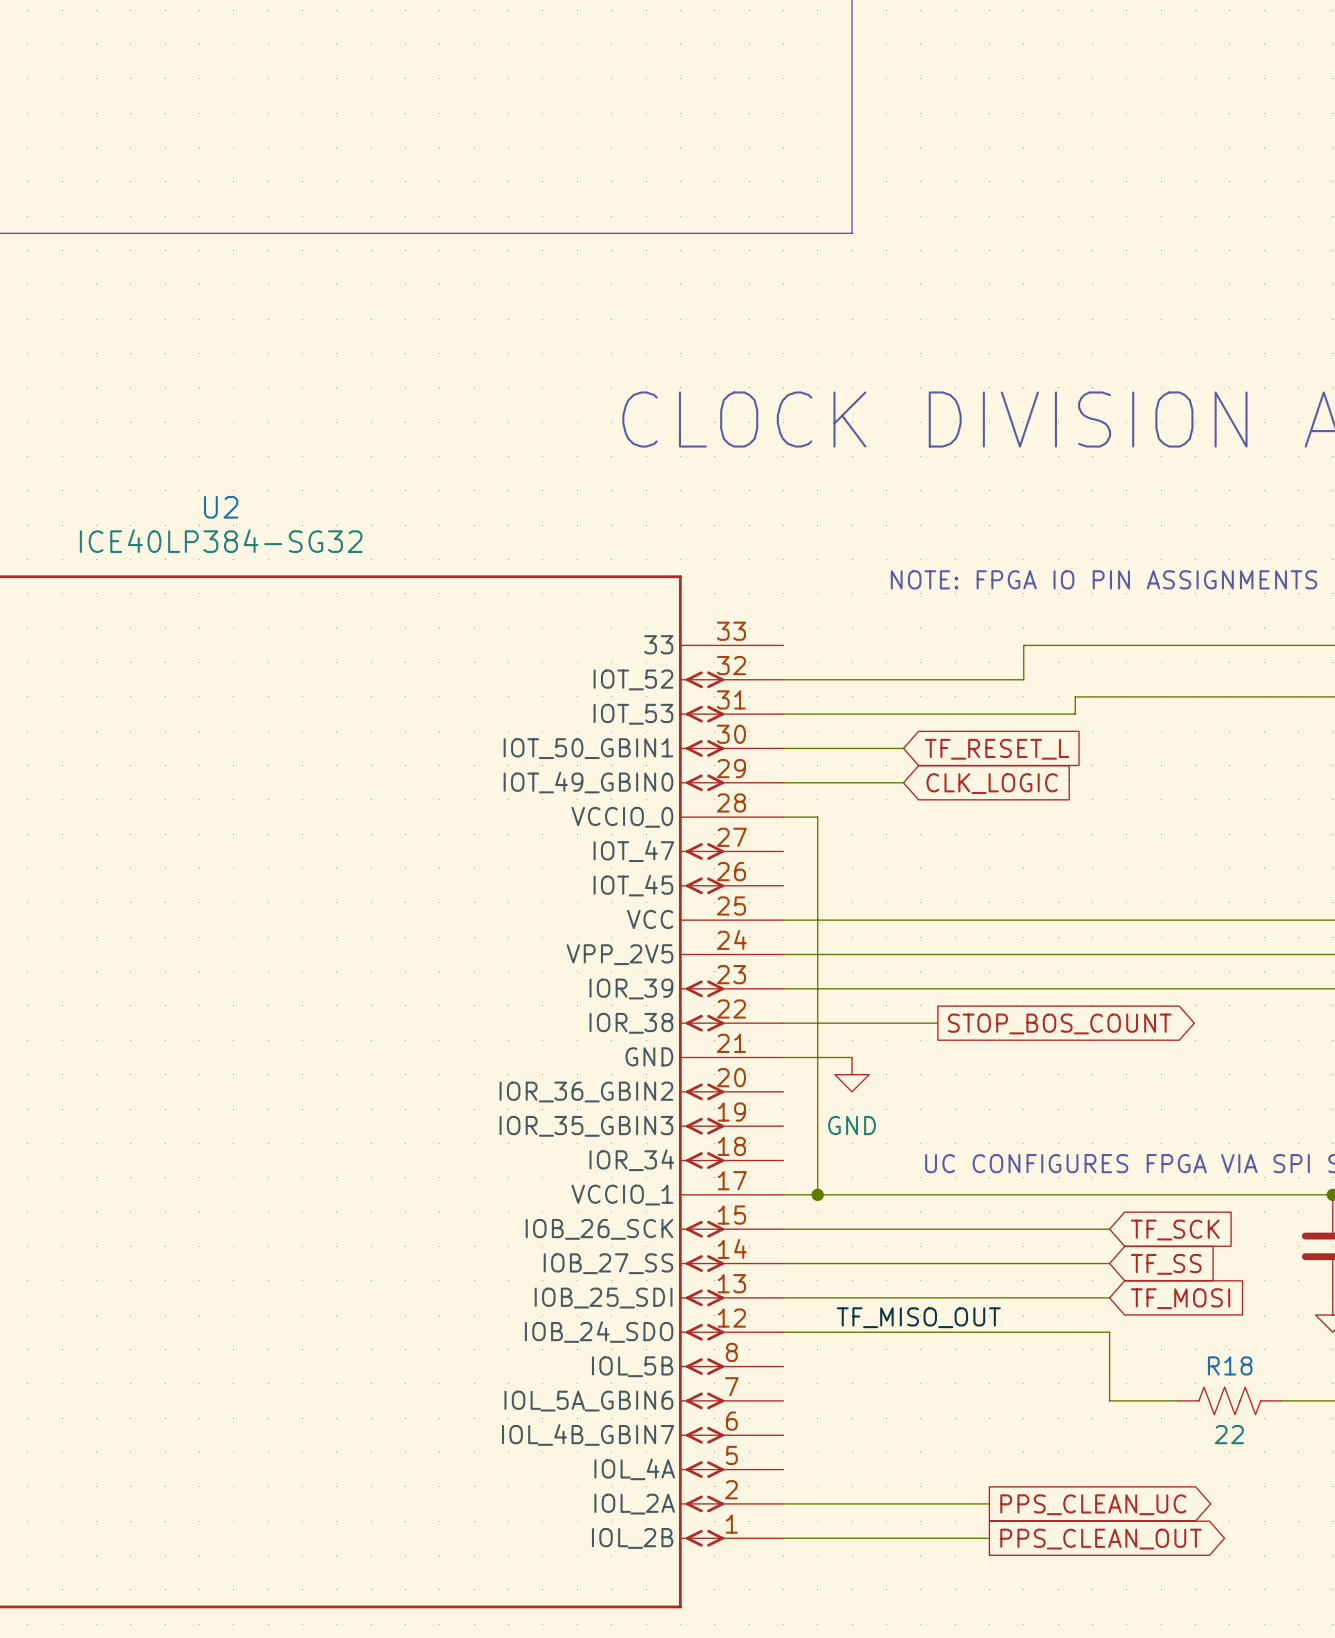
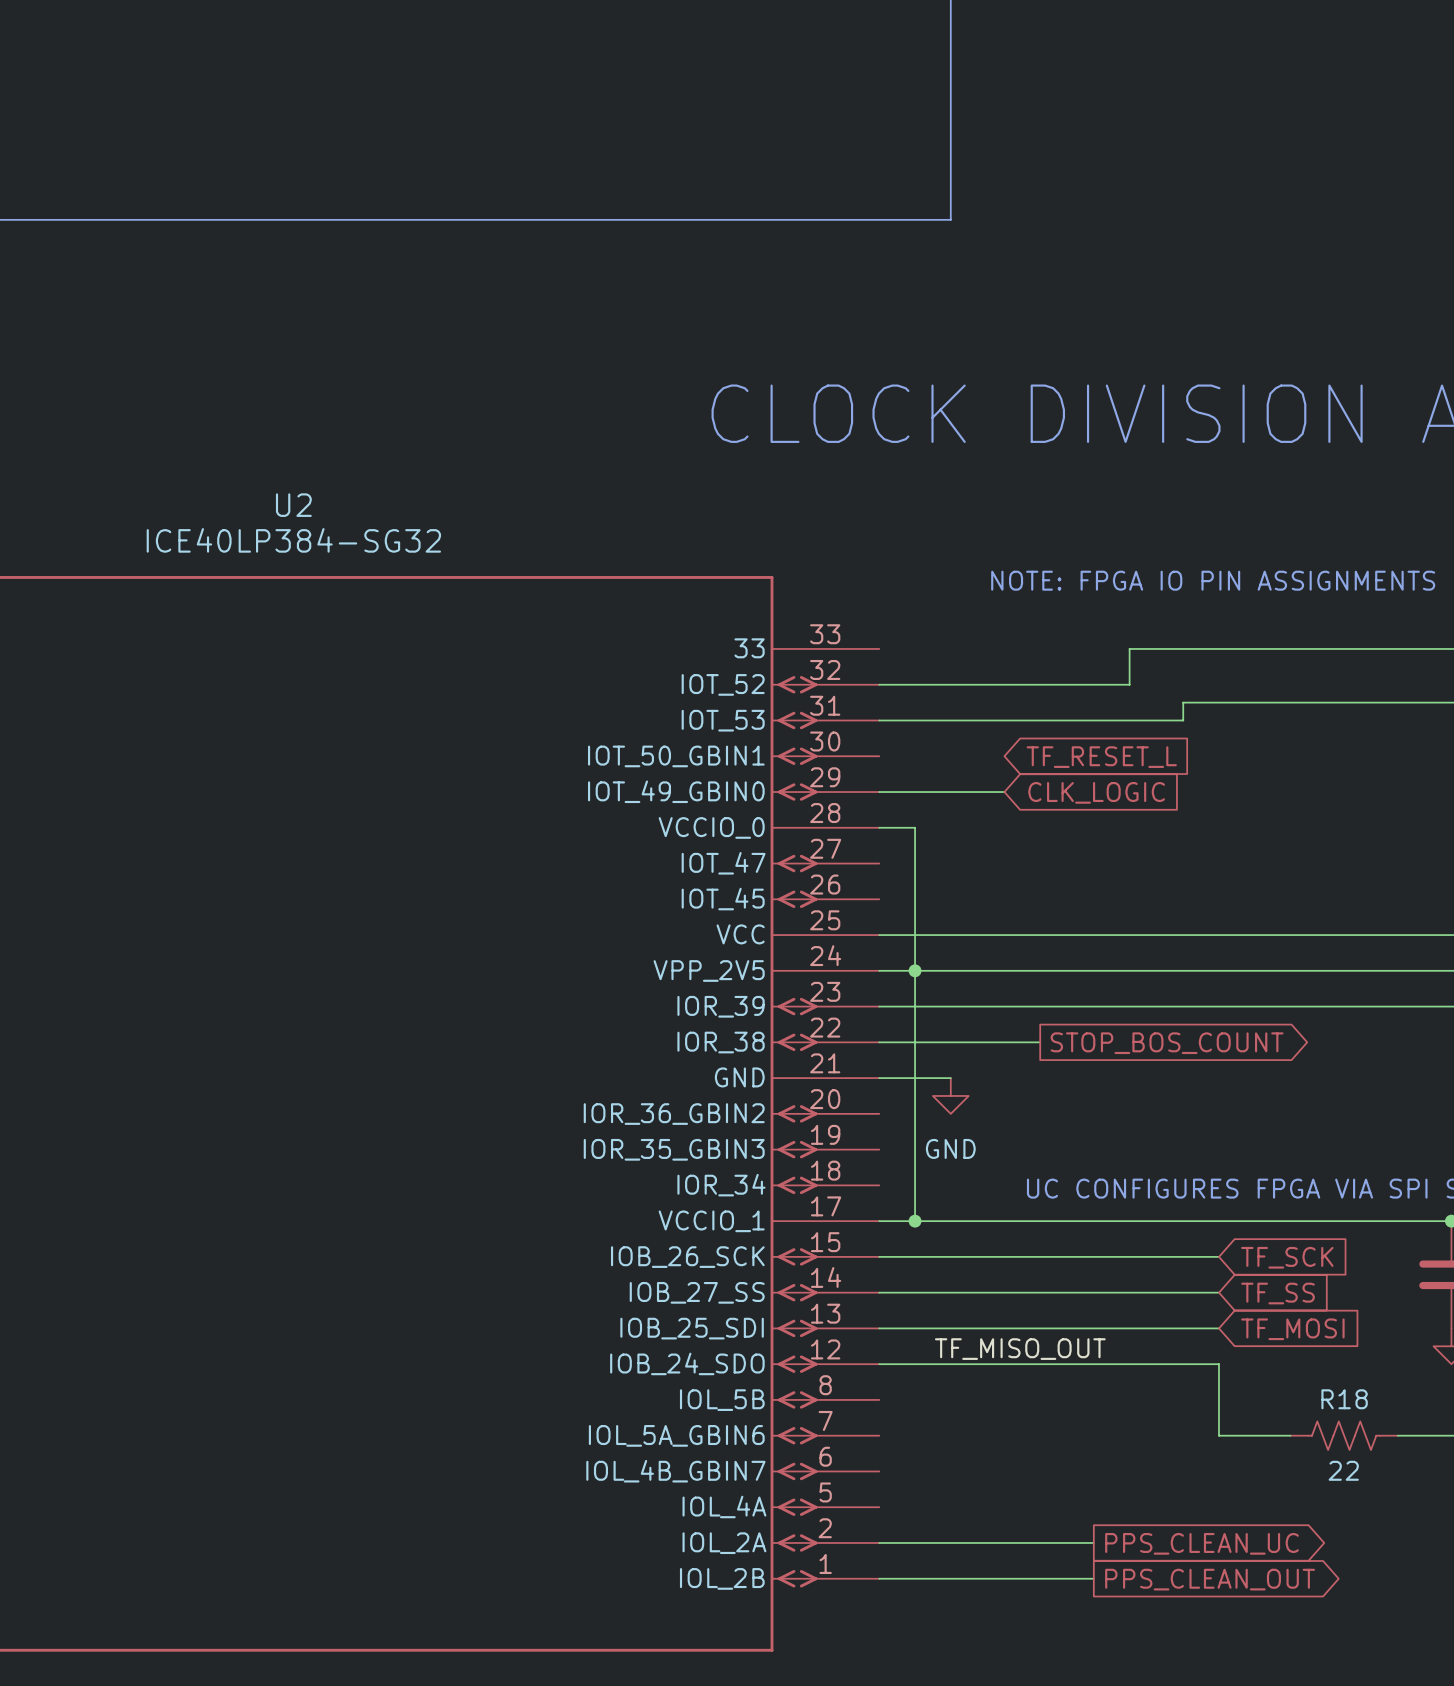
wire: (783, 748) (903, 748) -> none
junction: none -> (915, 970)

